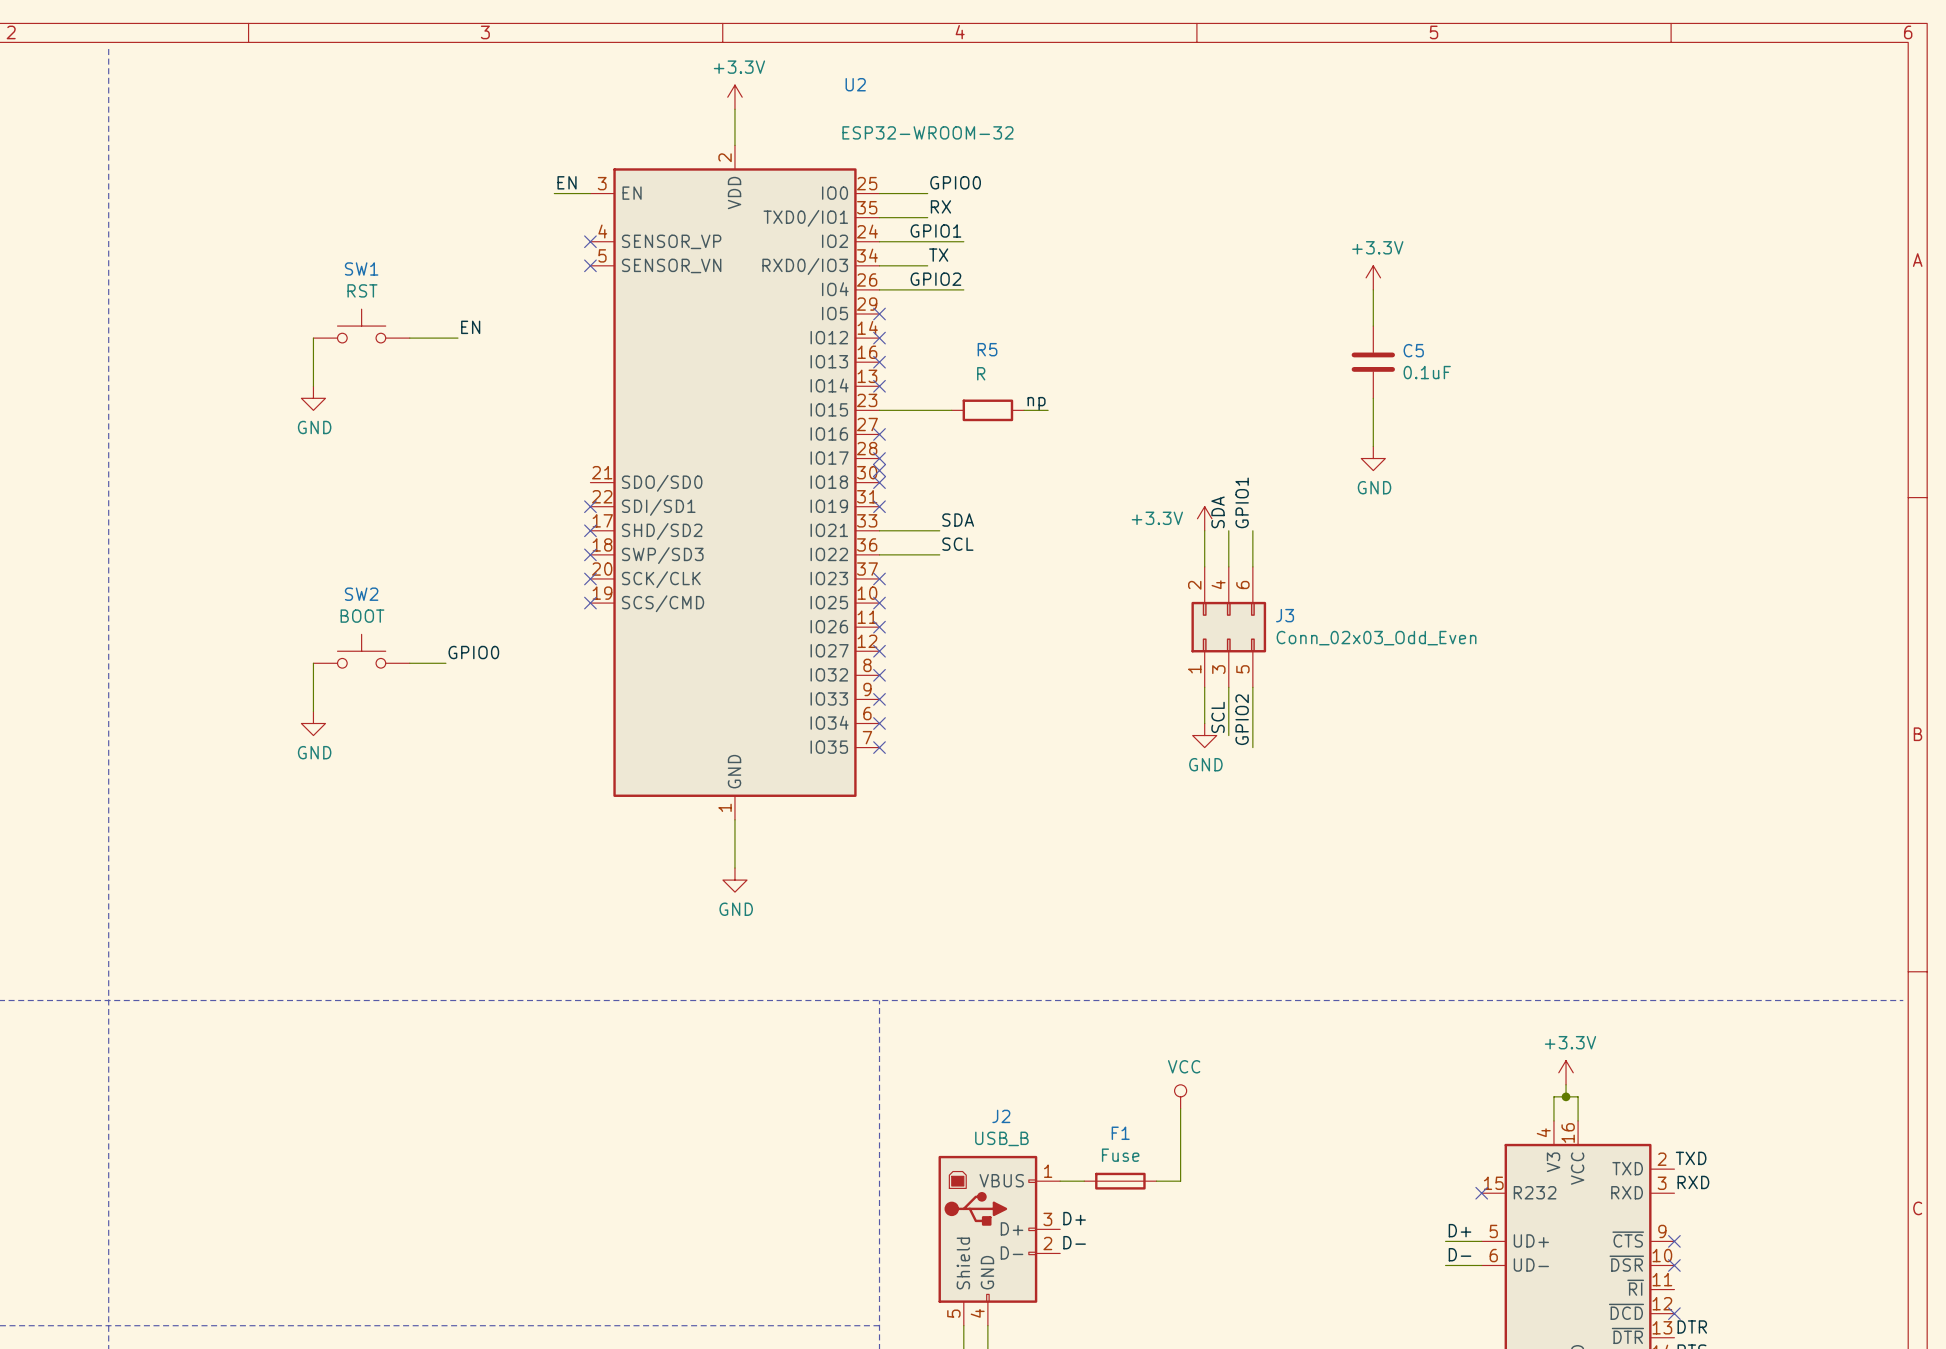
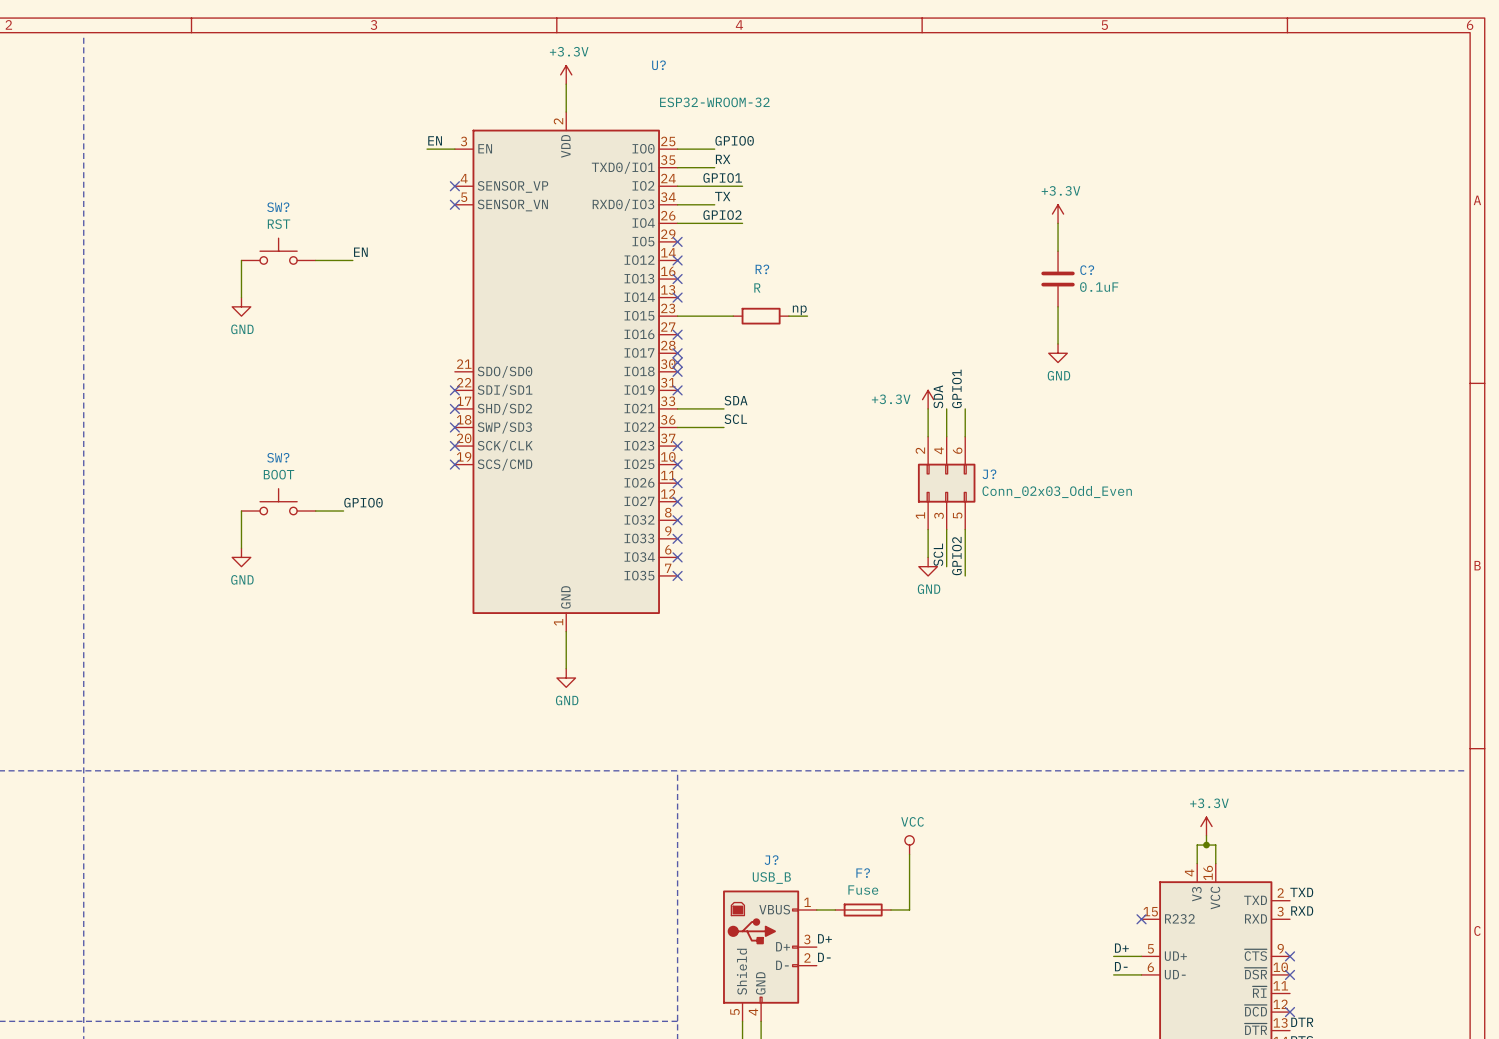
U2 name: U2 (855, 84) -> U? (658, 65)
SW1 name: SW1 (361, 268) -> SW? (278, 207)
R5 name: R5 (987, 349) -> R? (762, 269)
C5 name: C5 (1413, 350) -> C? (1087, 270)
SW2 name: SW2 (361, 594) -> SW? (278, 457)
J3 name: J3 (1285, 615) -> J? (989, 474)
J2 name: J2 (1001, 1116) -> J? (771, 860)
F1 name: F1 (1120, 1133) -> F? (863, 873)

